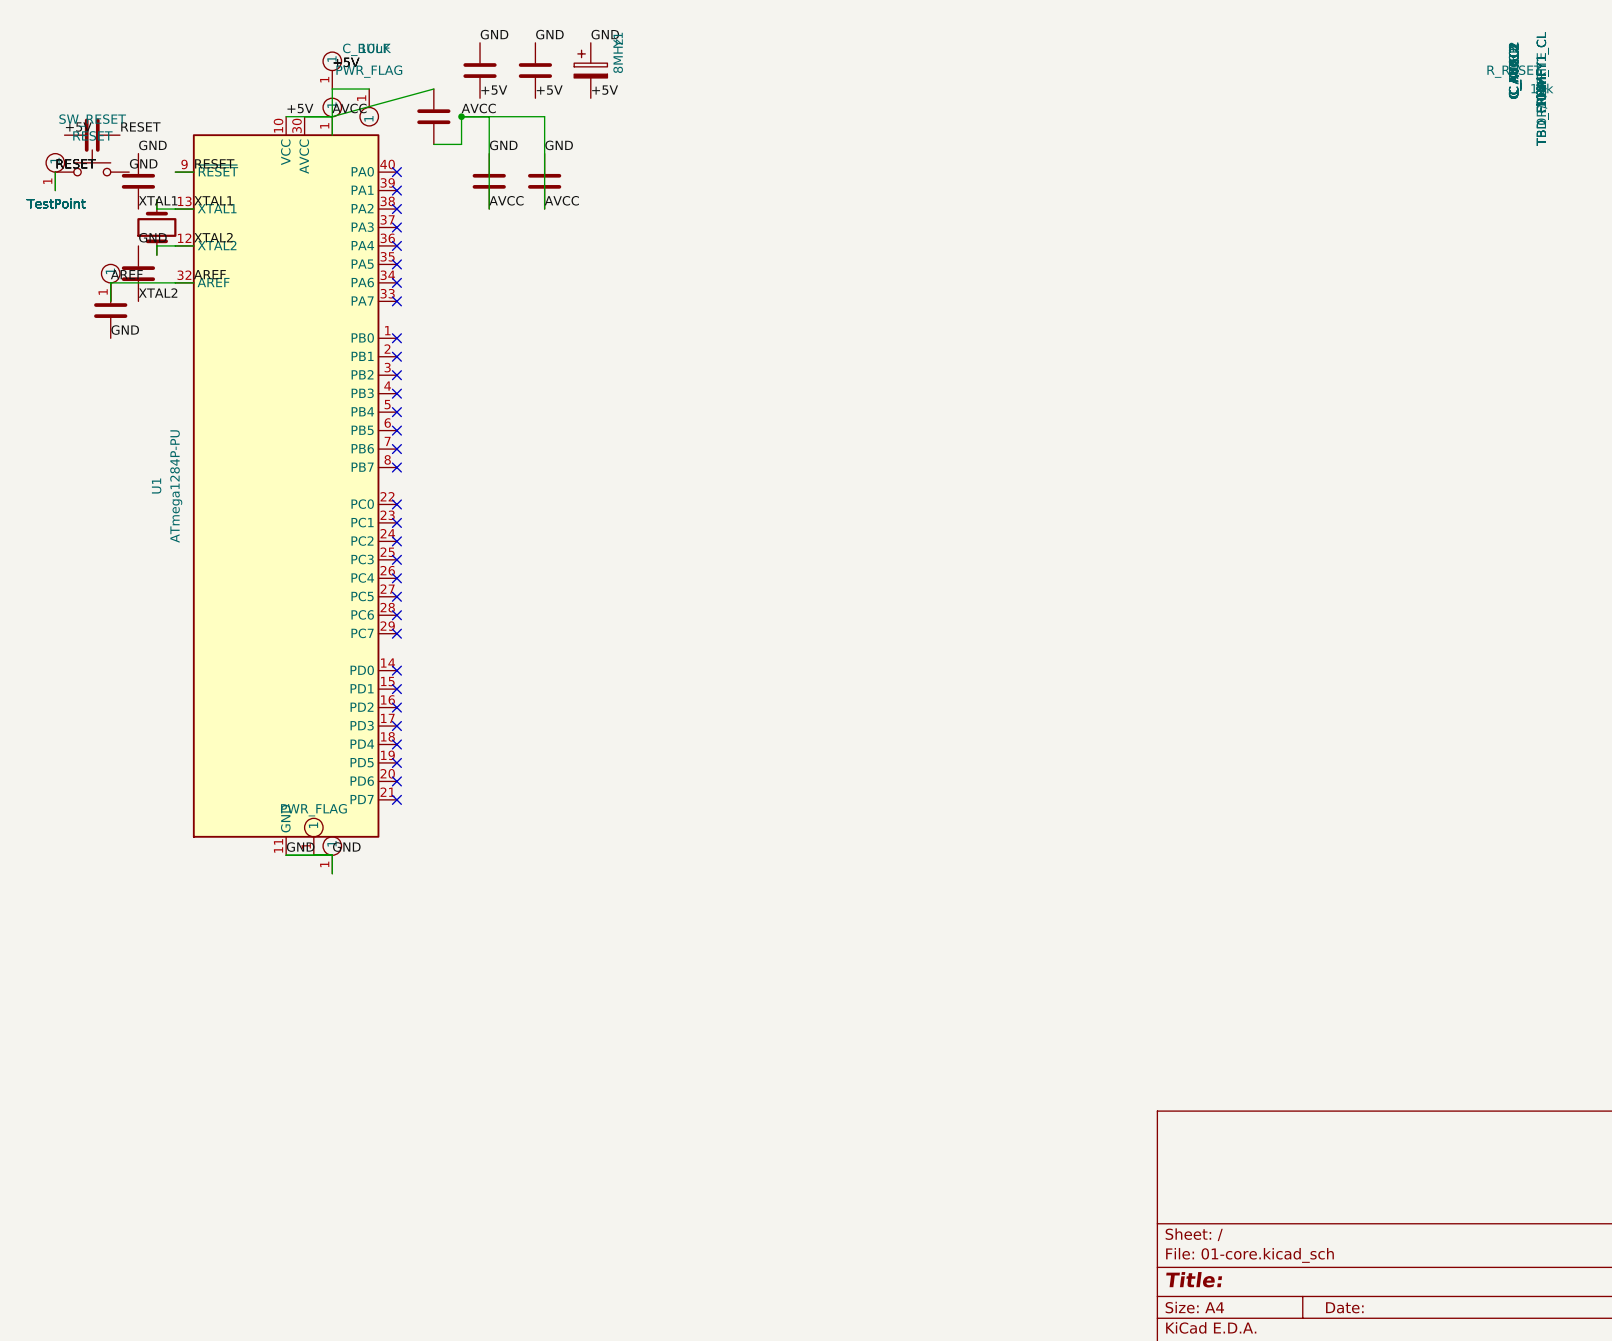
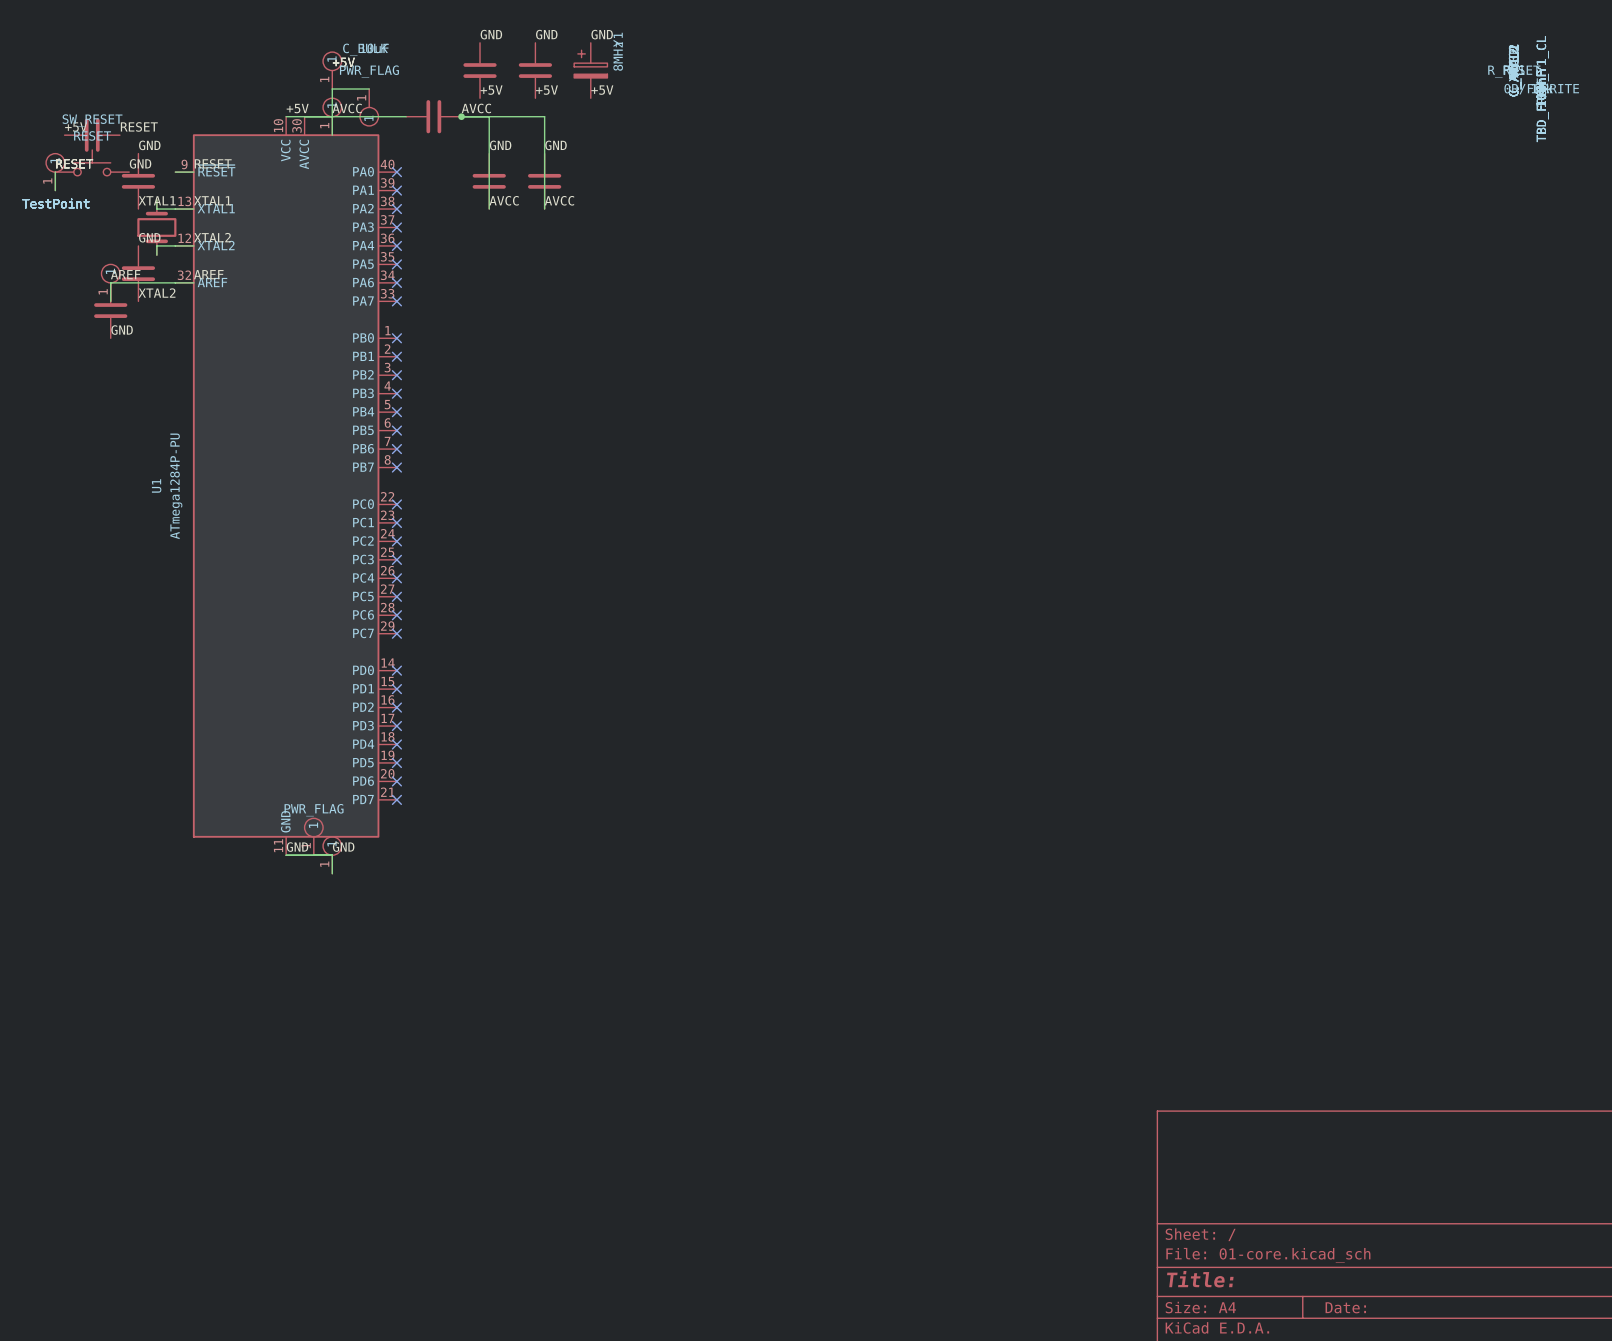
wire: (433, 89) (332, 116) -> (406, 116) (332, 116)
part rotation: 0° (433, 116) -> 90° clockwise (433, 116)
wire: (461, 116) (461, 144) (433, 144) -> none

